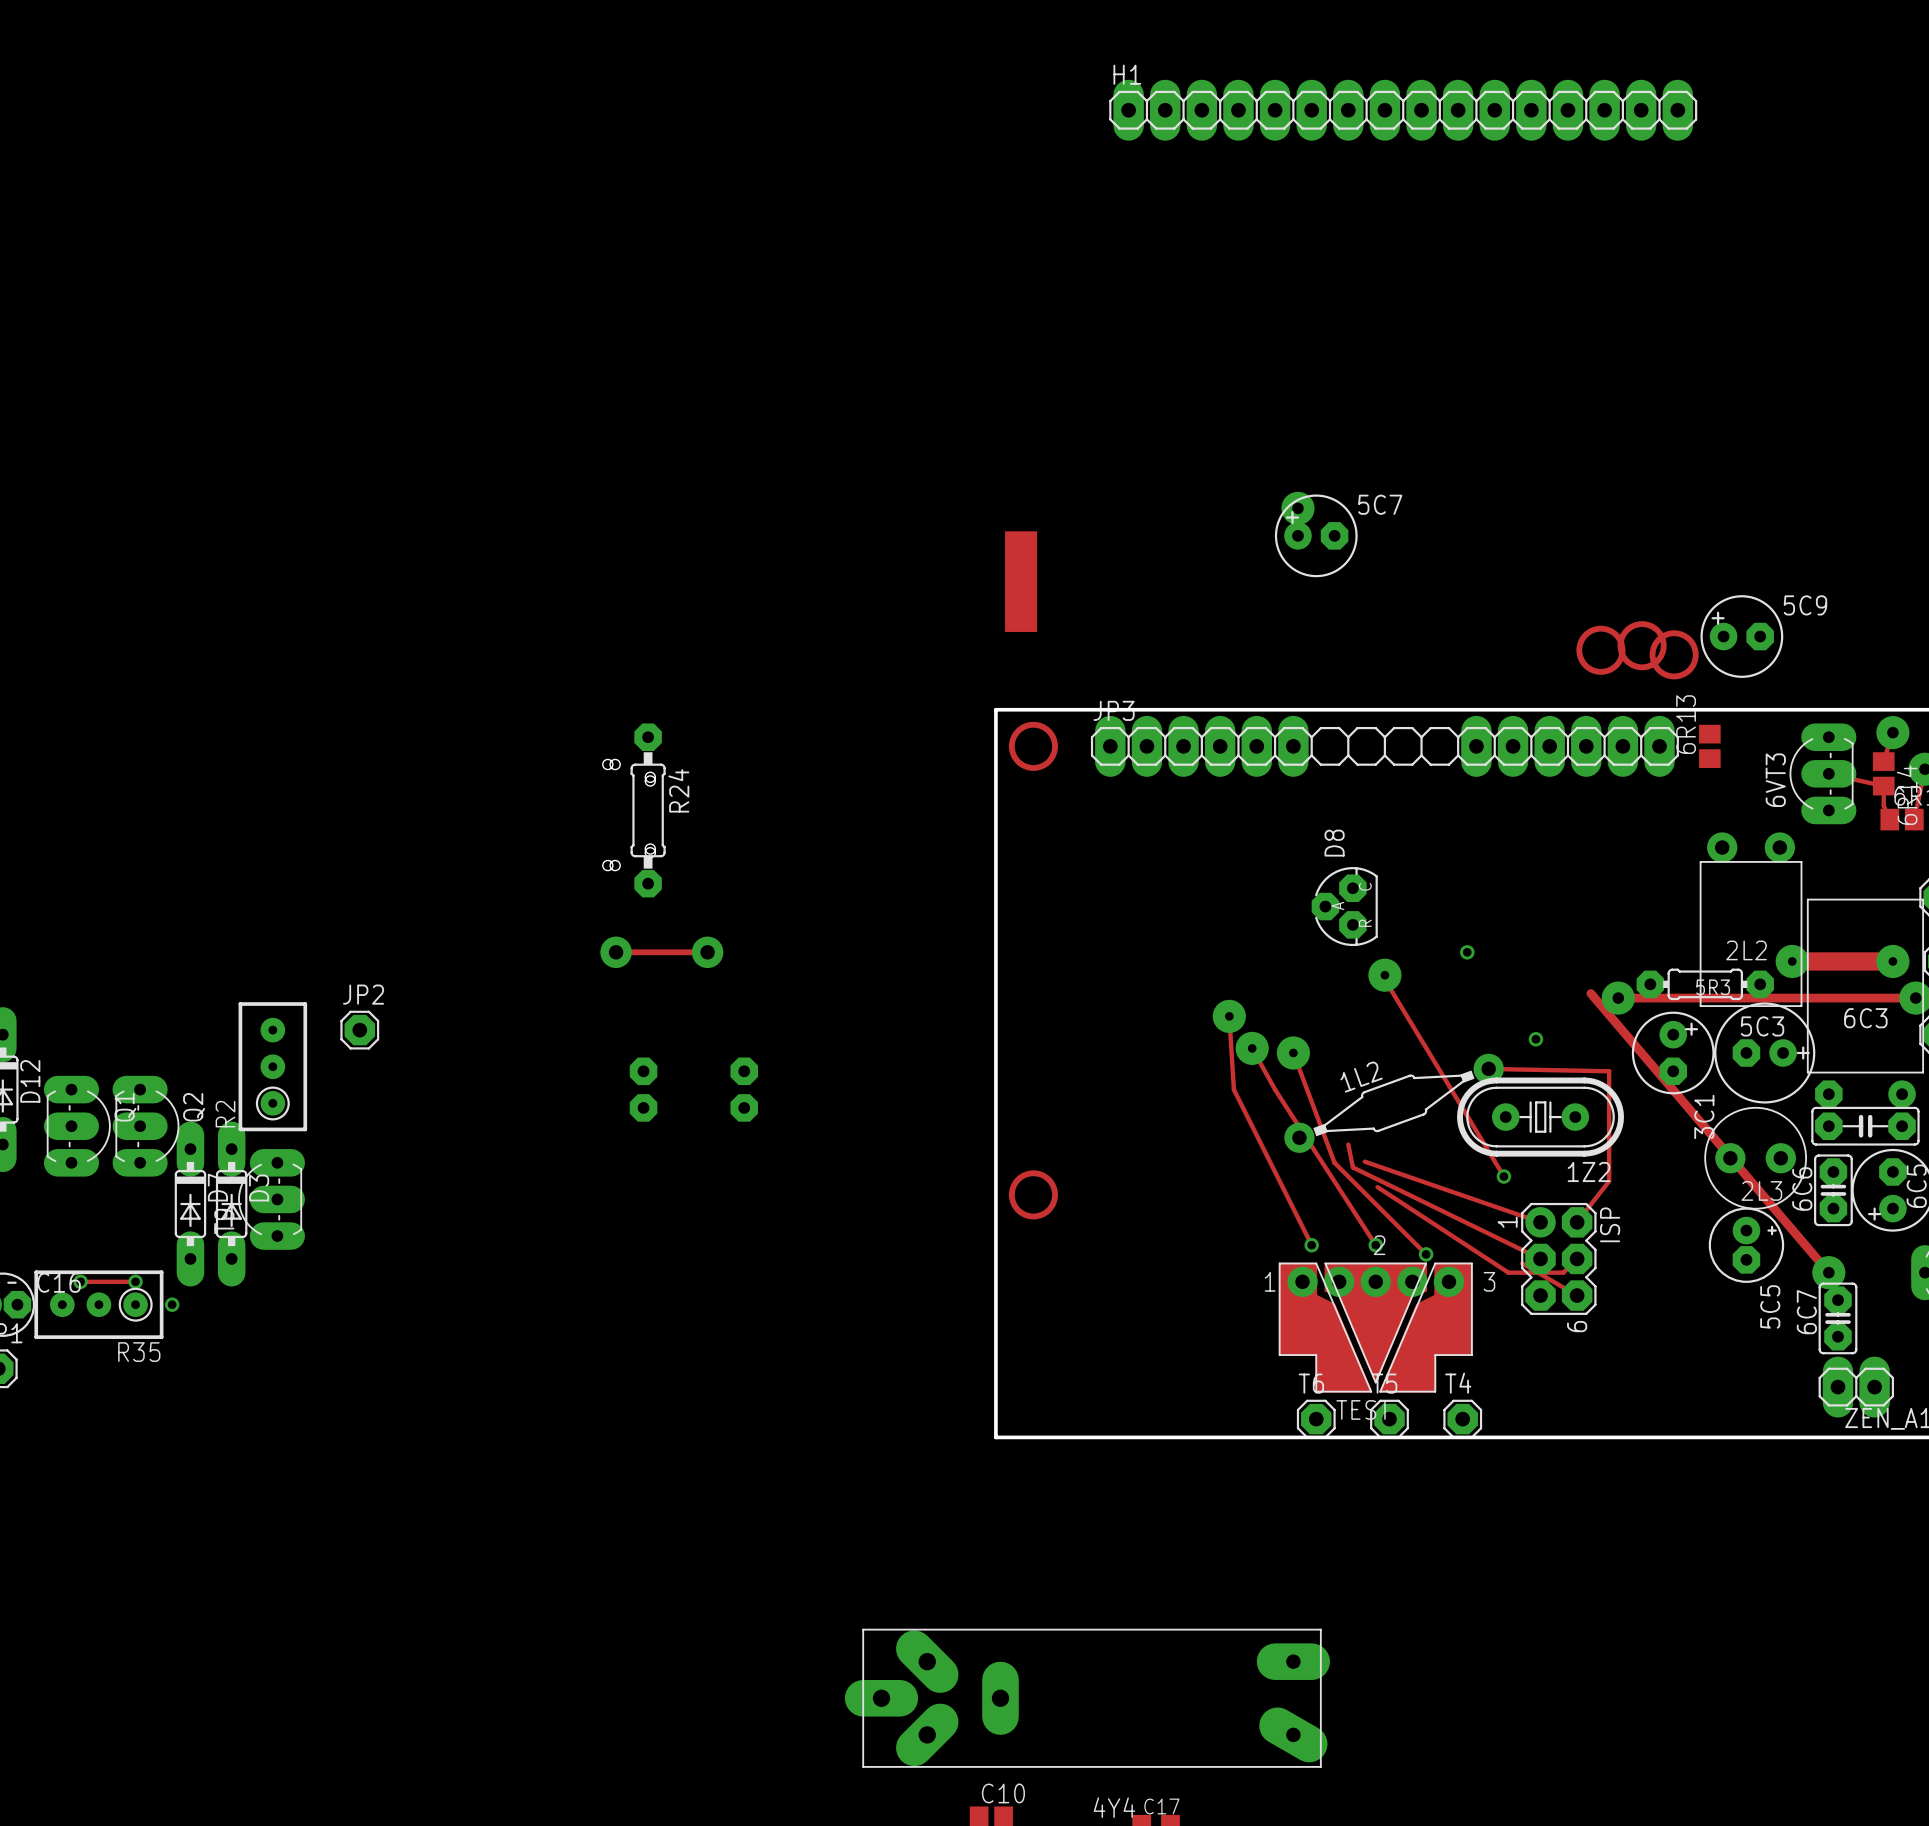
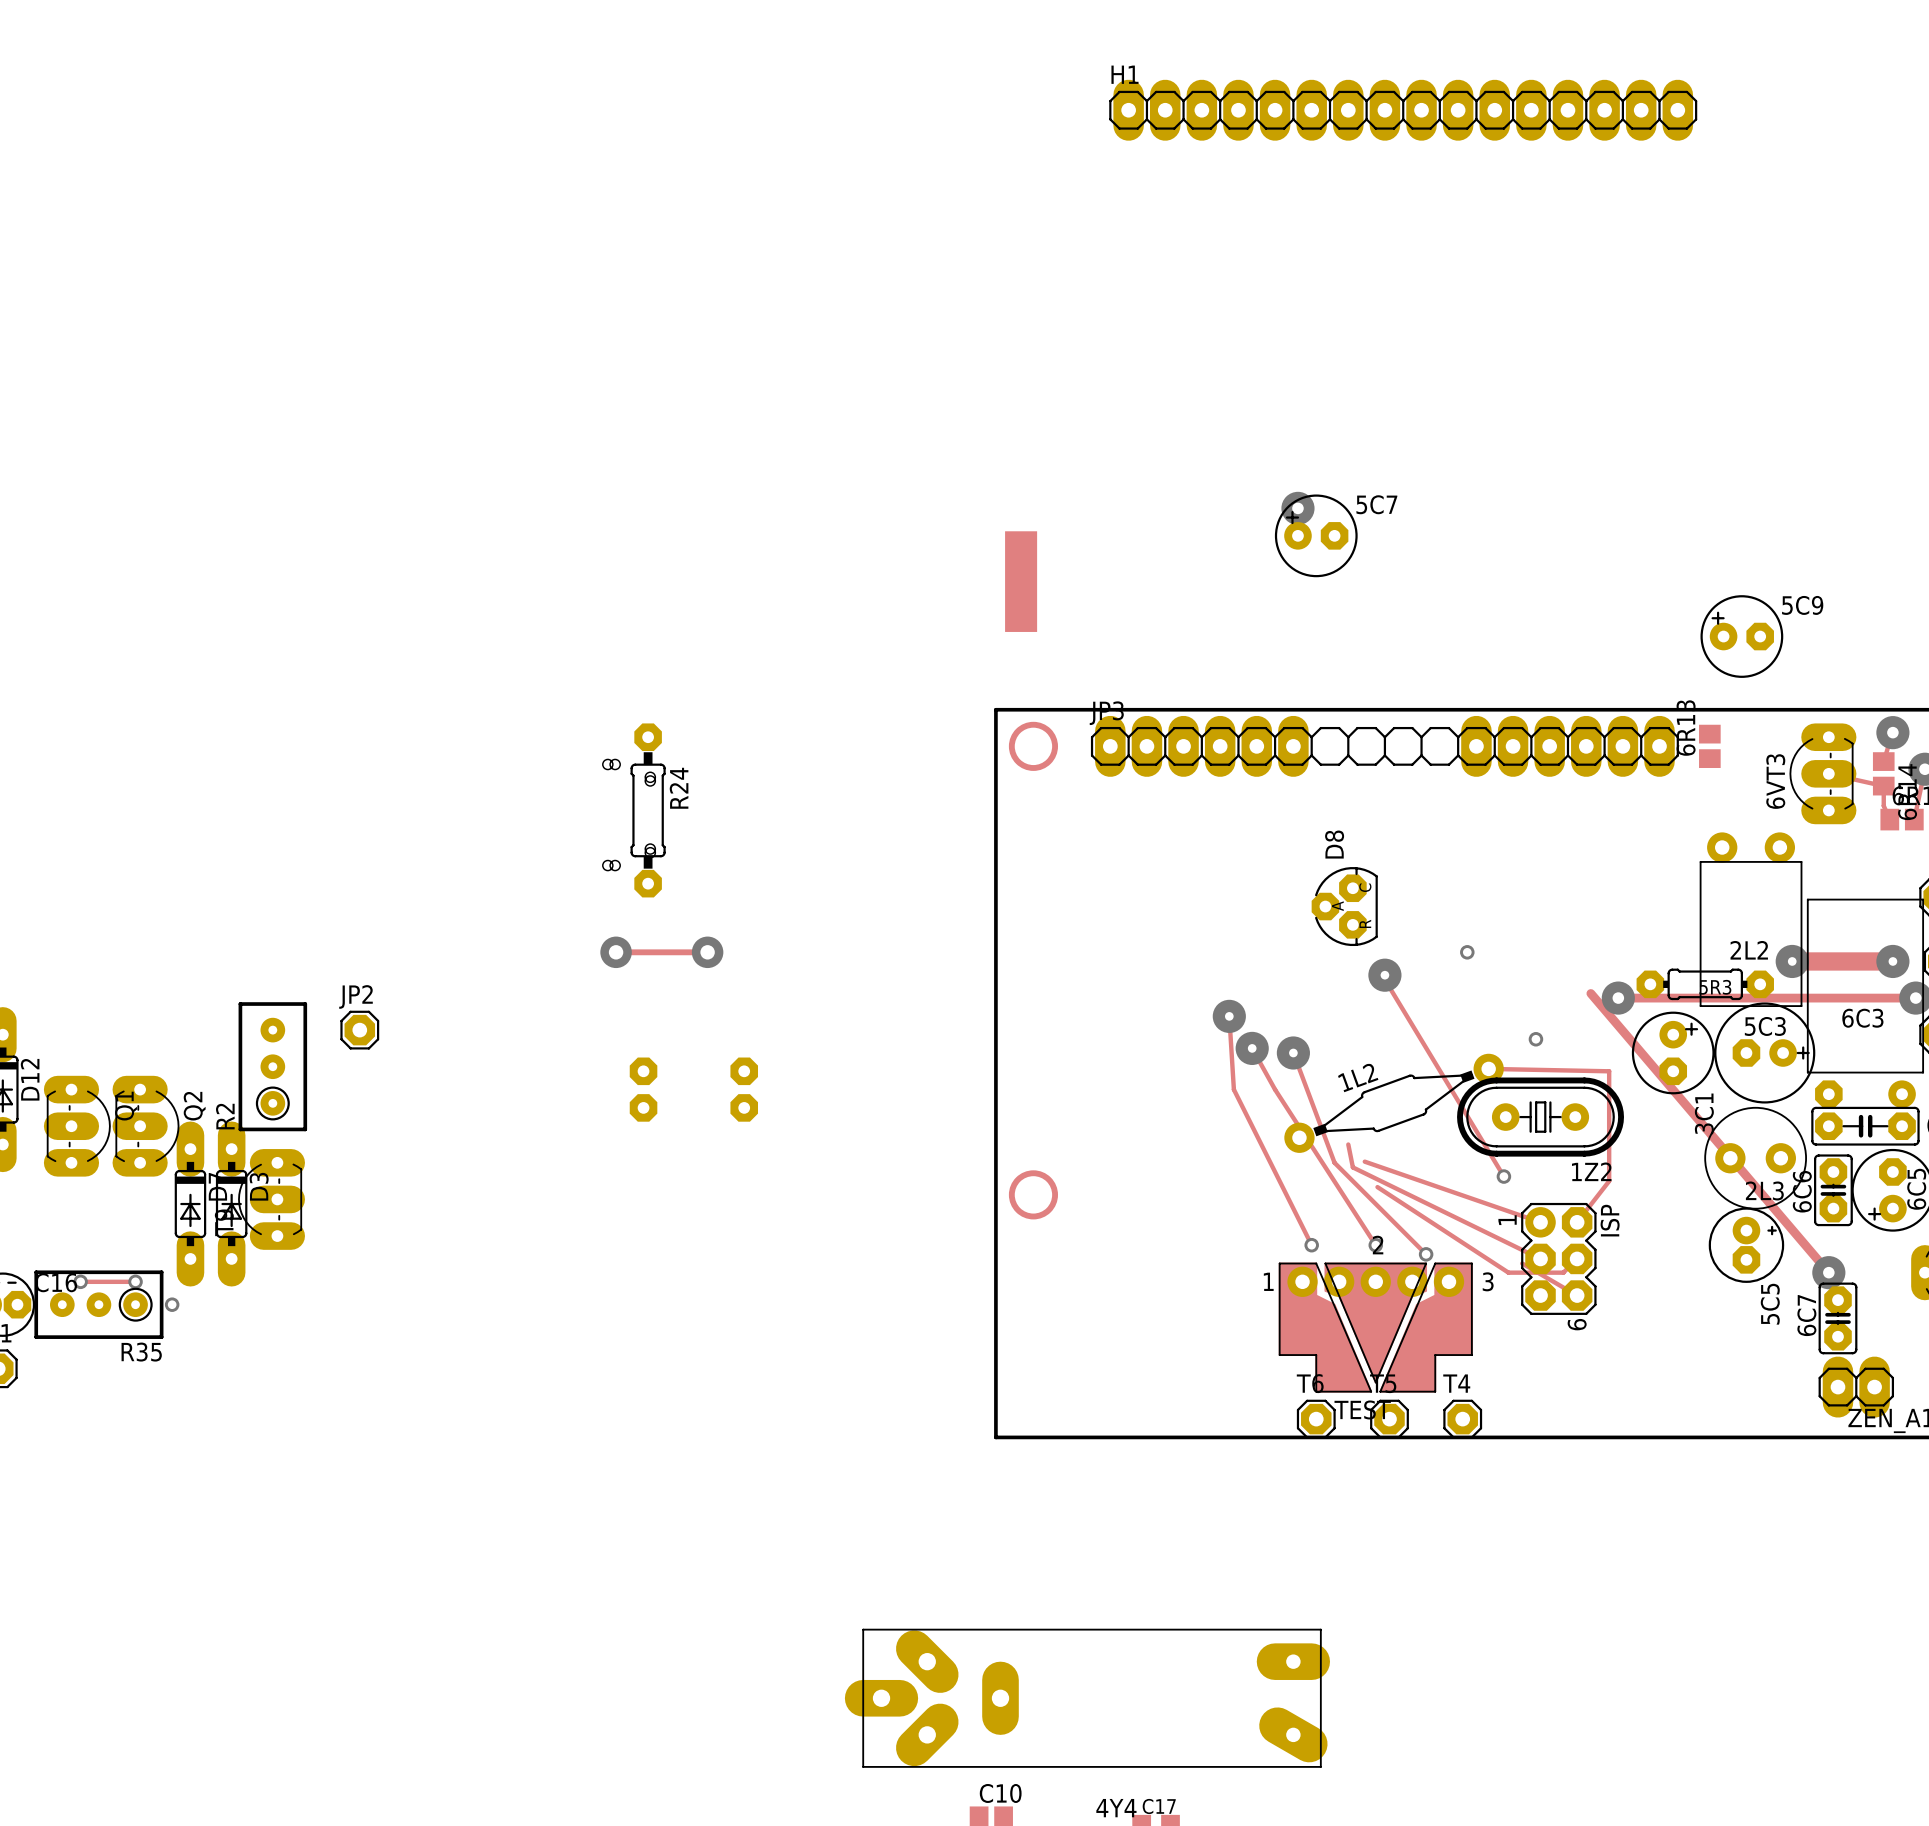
drawing: [1576, 621, 1699, 680] -> none

